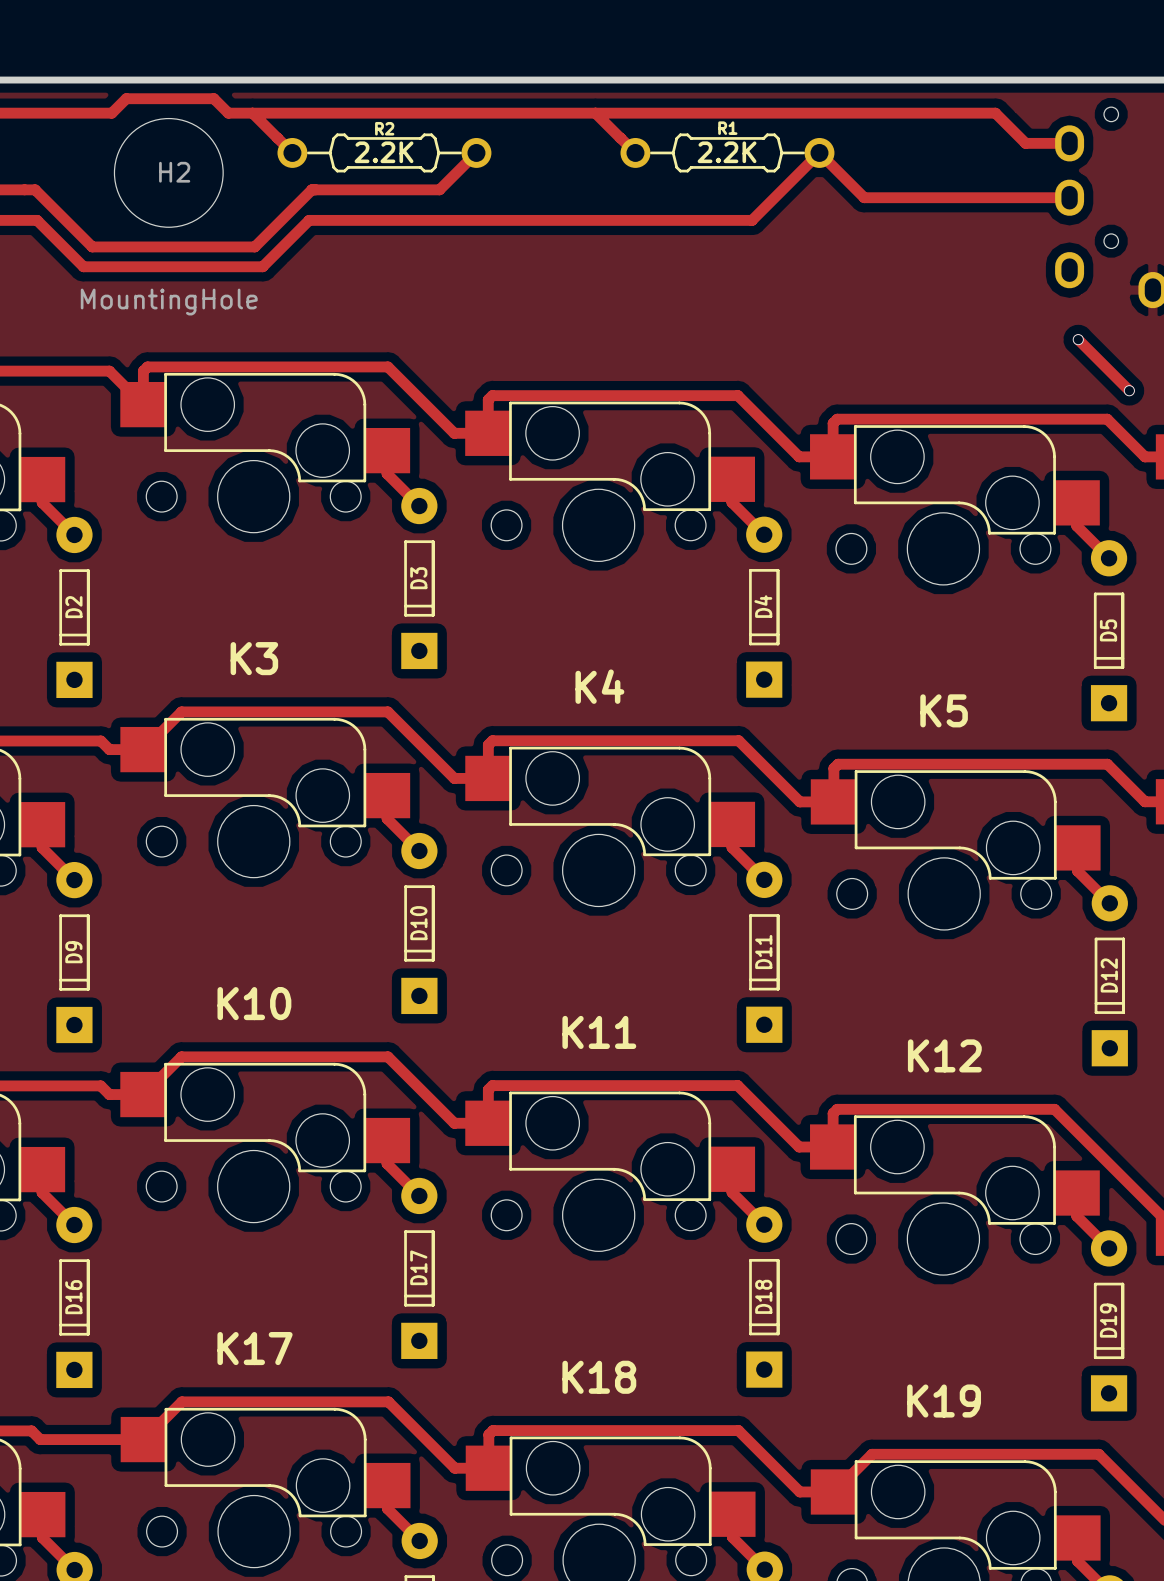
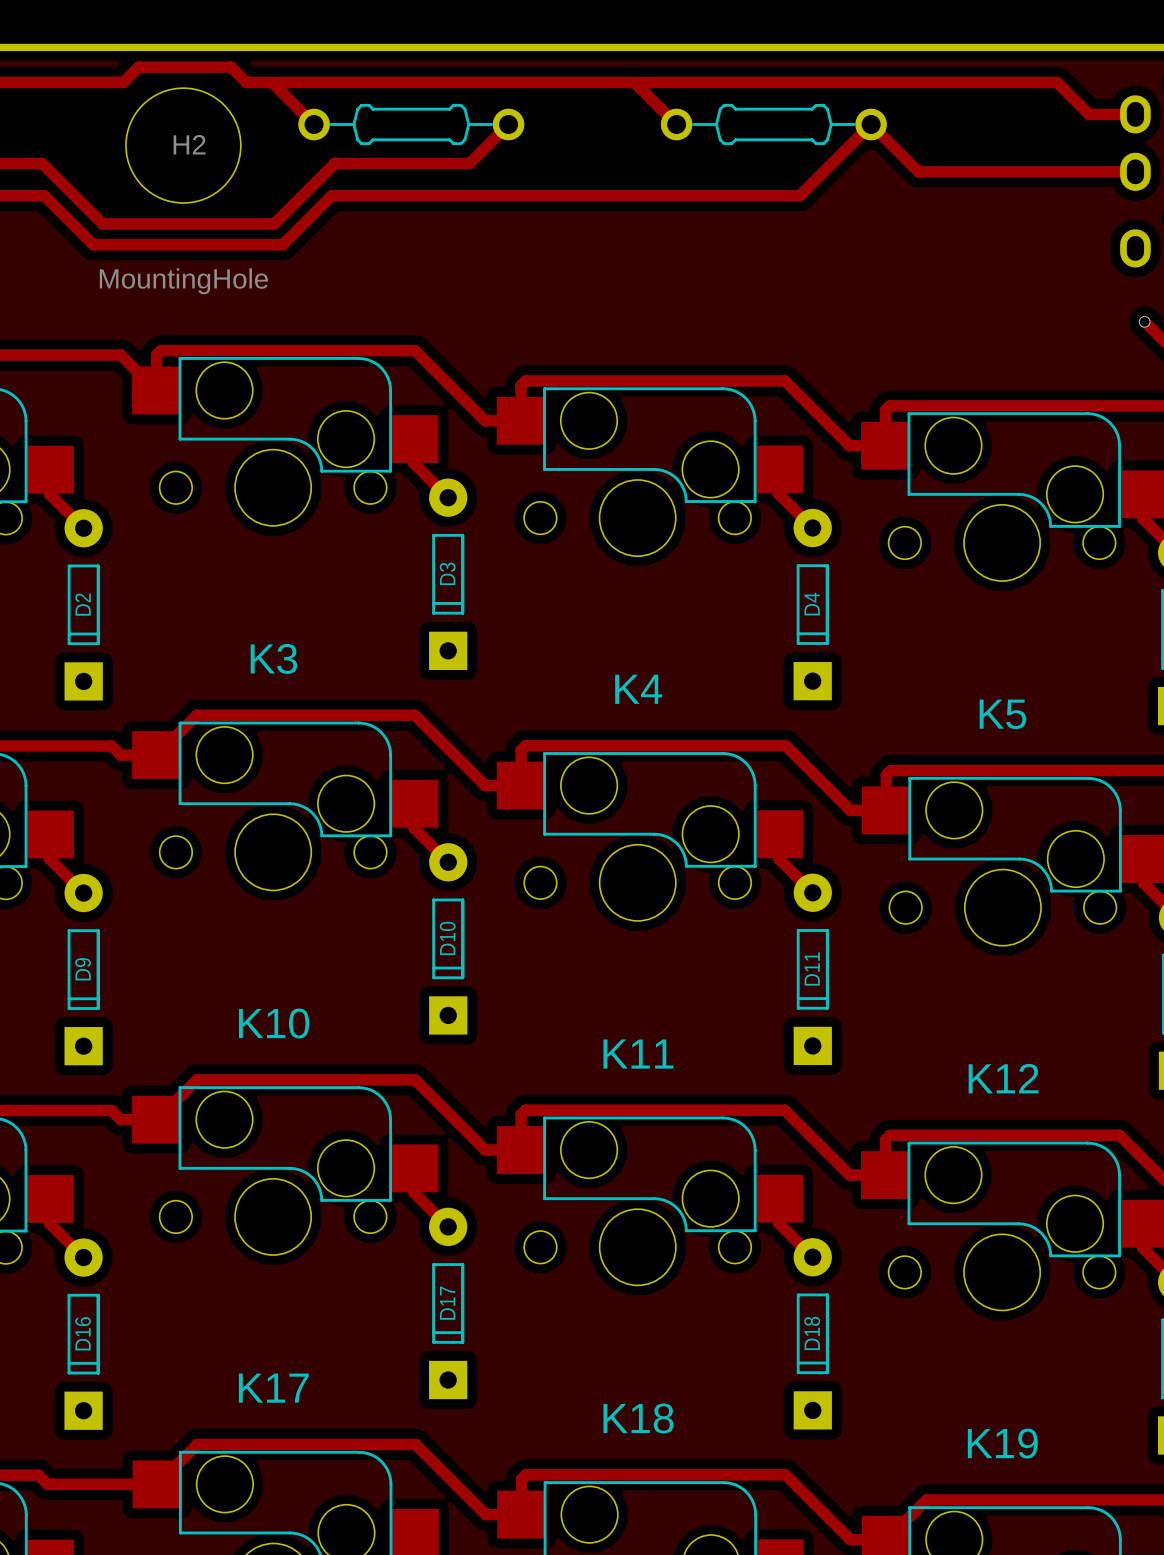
R2 name: R2 (384, 128) -> none
R1 name: R1 (727, 128) -> none
R2 value: 2.2K (384, 152) -> none
R1 value: 2.2K (727, 152) -> none

